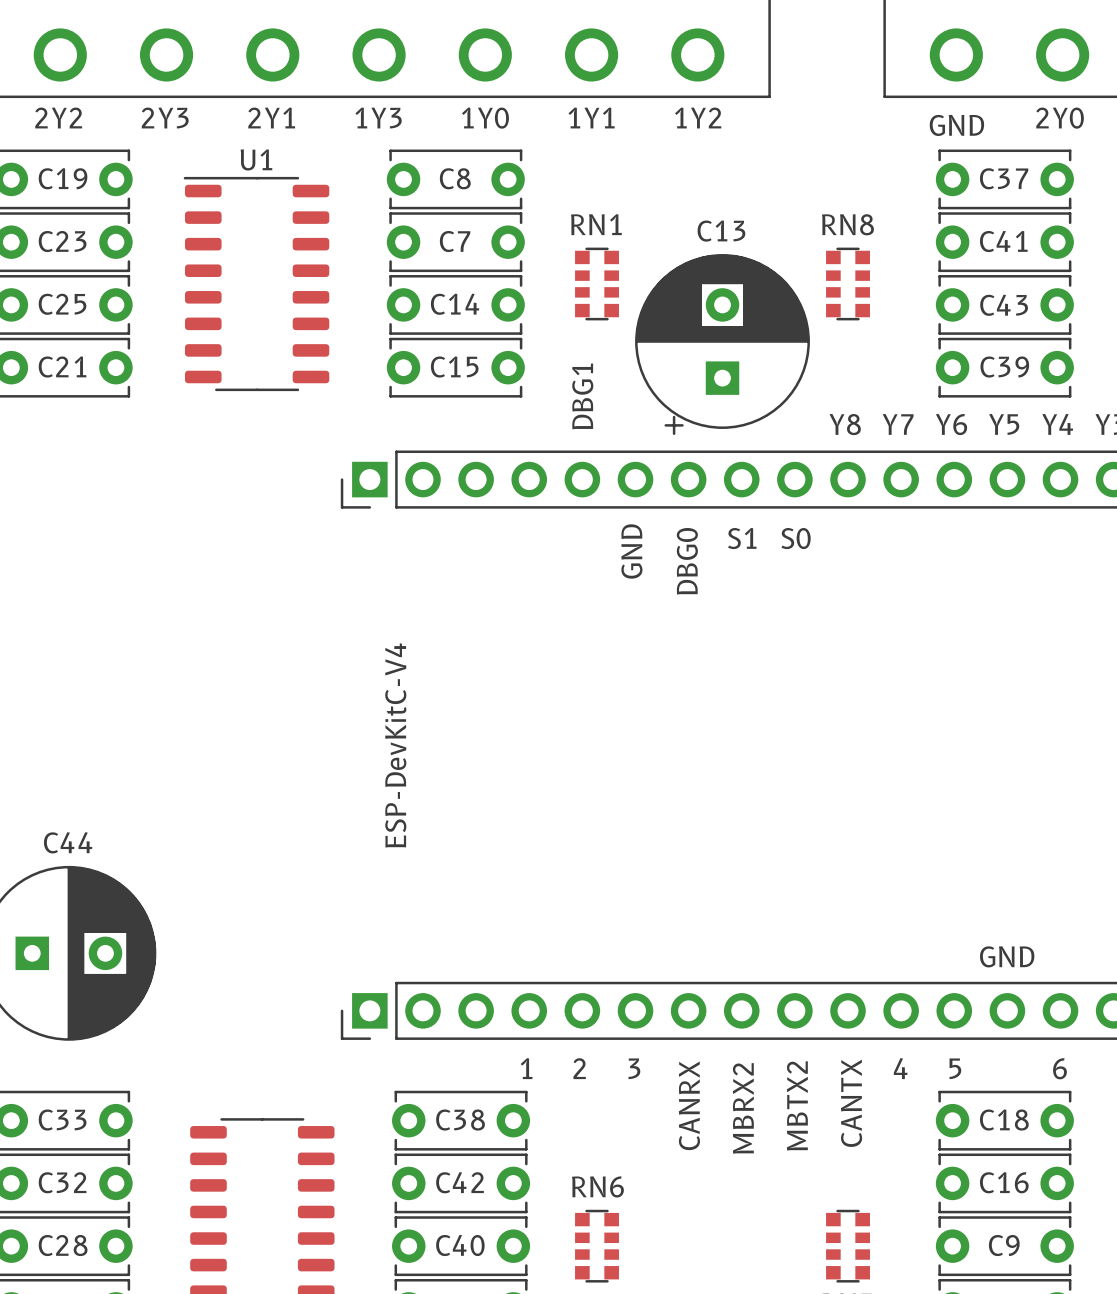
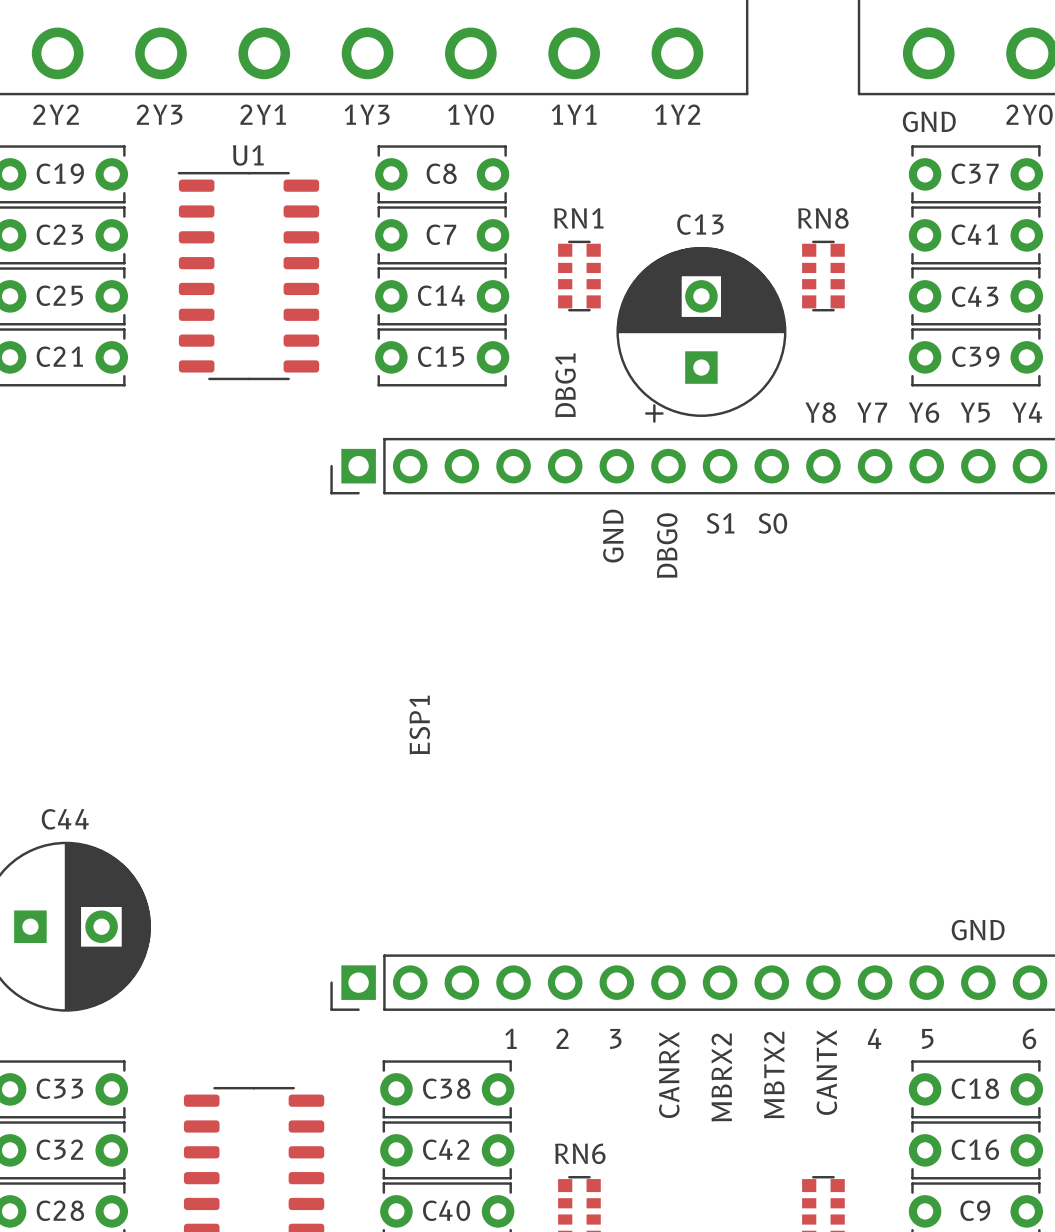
ESP1 value: ESP-DevKitC-V4 (395, 745) -> none
ESP1 name: none -> ESP1 (419, 725)

